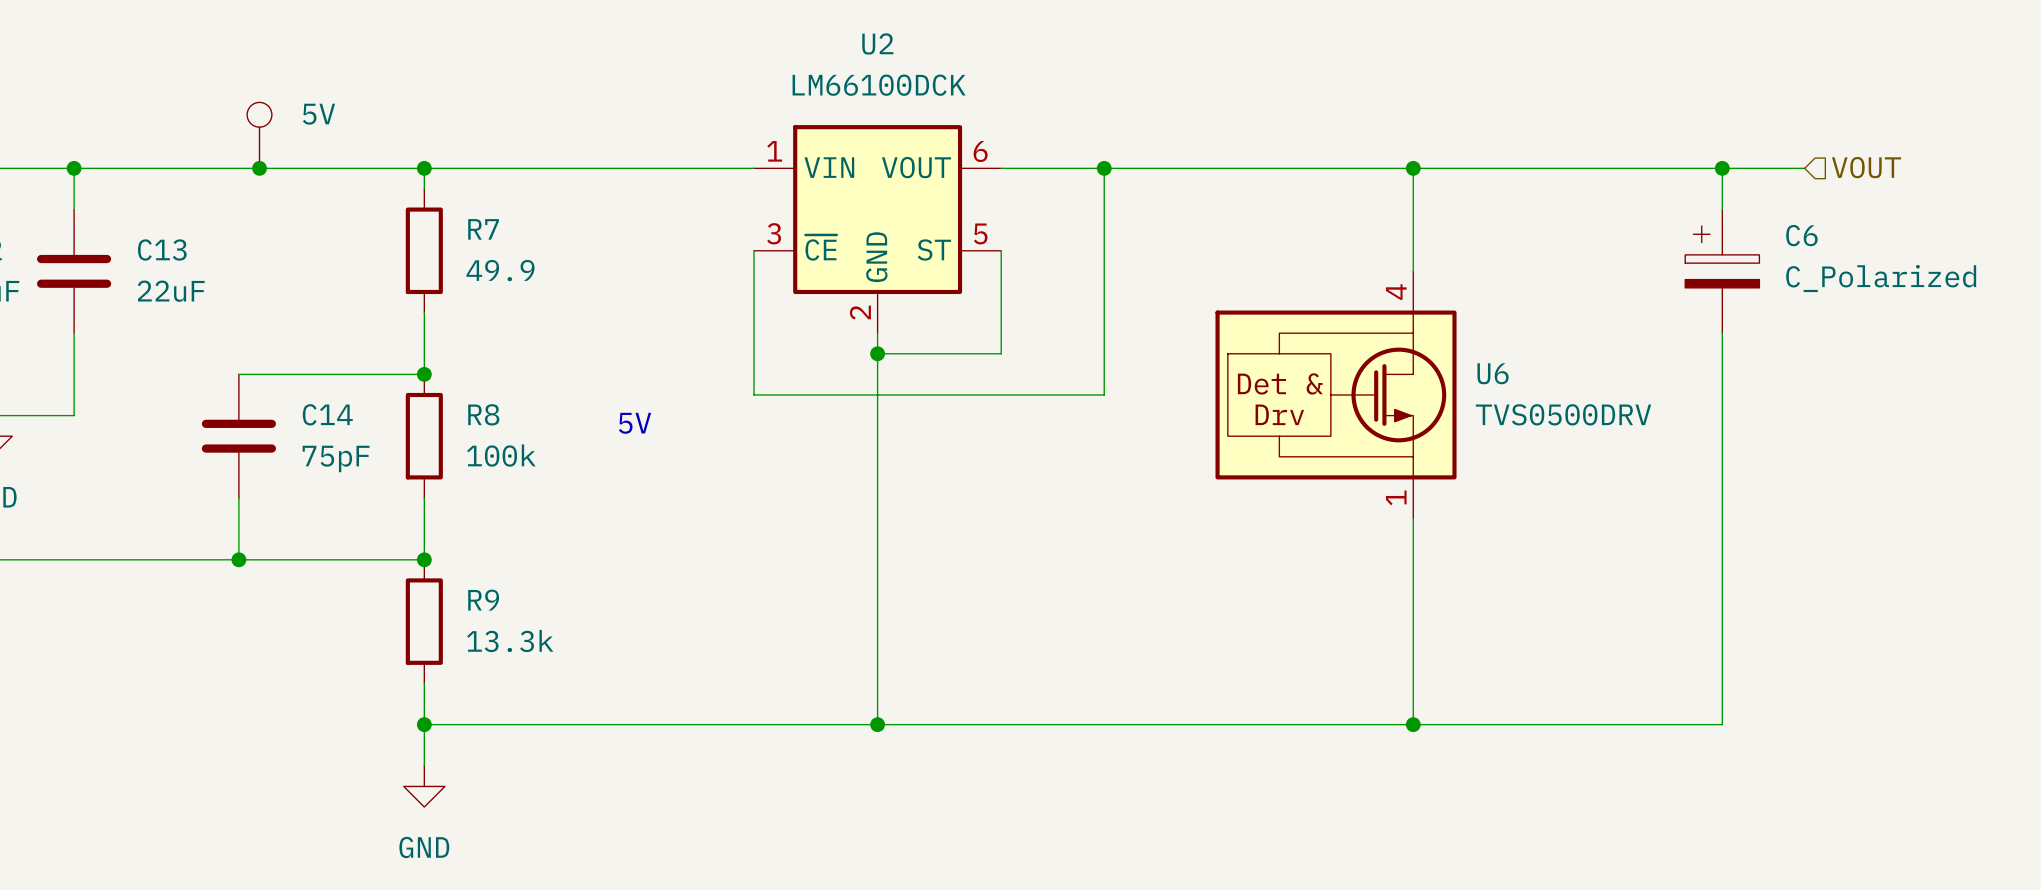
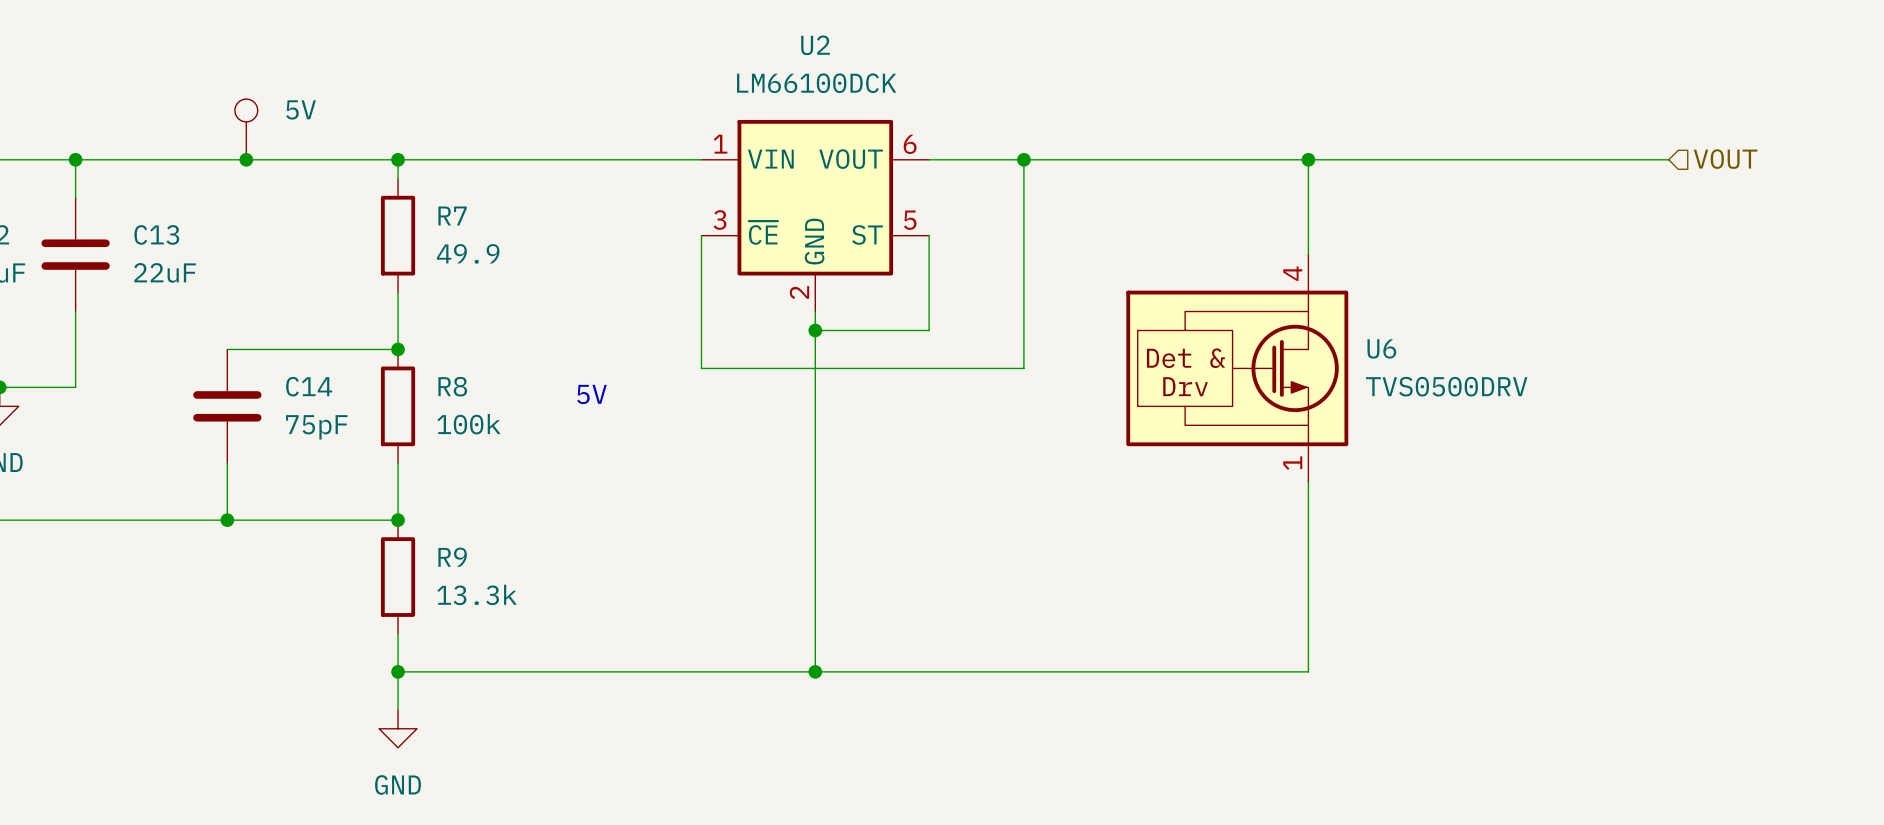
wire: (1722, 168) (1722, 209) -> none
junction: (1722, 168) -> none
C6: C_Polarized (1722, 271) -> none
wire: (1722, 333) (1722, 724) (1413, 724) -> none
junction: (1413, 724) -> none

